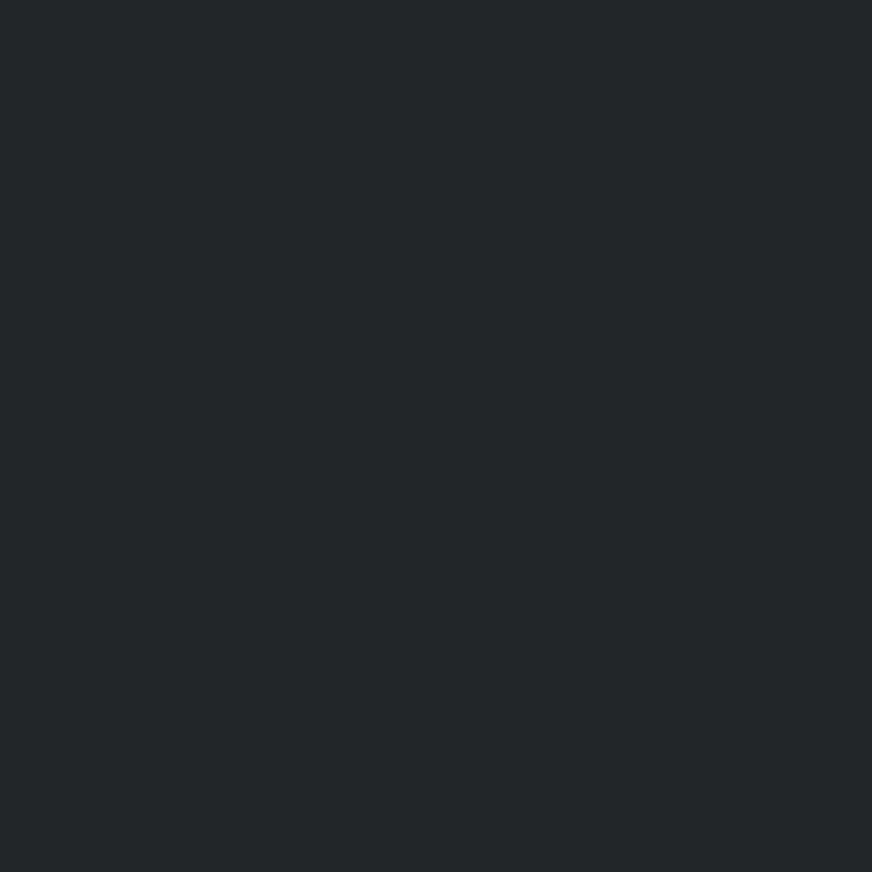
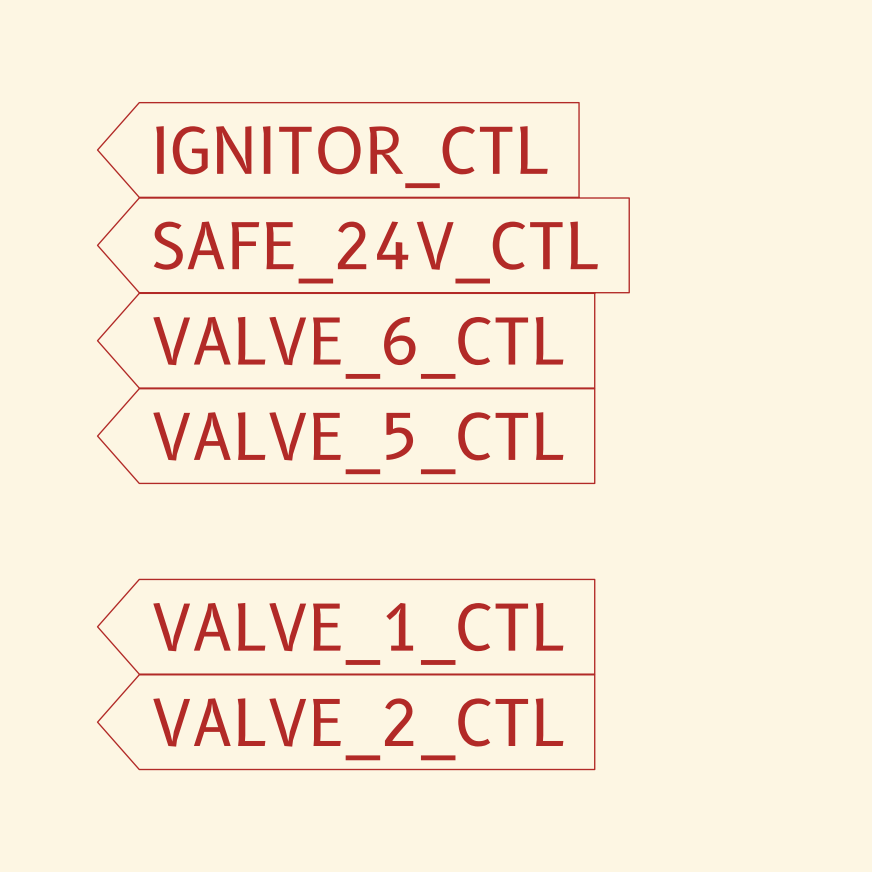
global label: none -> IGNITOR_CTL (351, 157)
global label: none -> SAFE_24V_CTL (375, 252)
global label: none -> VALVE_6_CTL (358, 347)
global label: none -> VALVE_5_CTL (358, 443)
global label: none -> VALVE_1_CTL (358, 633)
global label: none -> VALVE_2_CTL (358, 729)

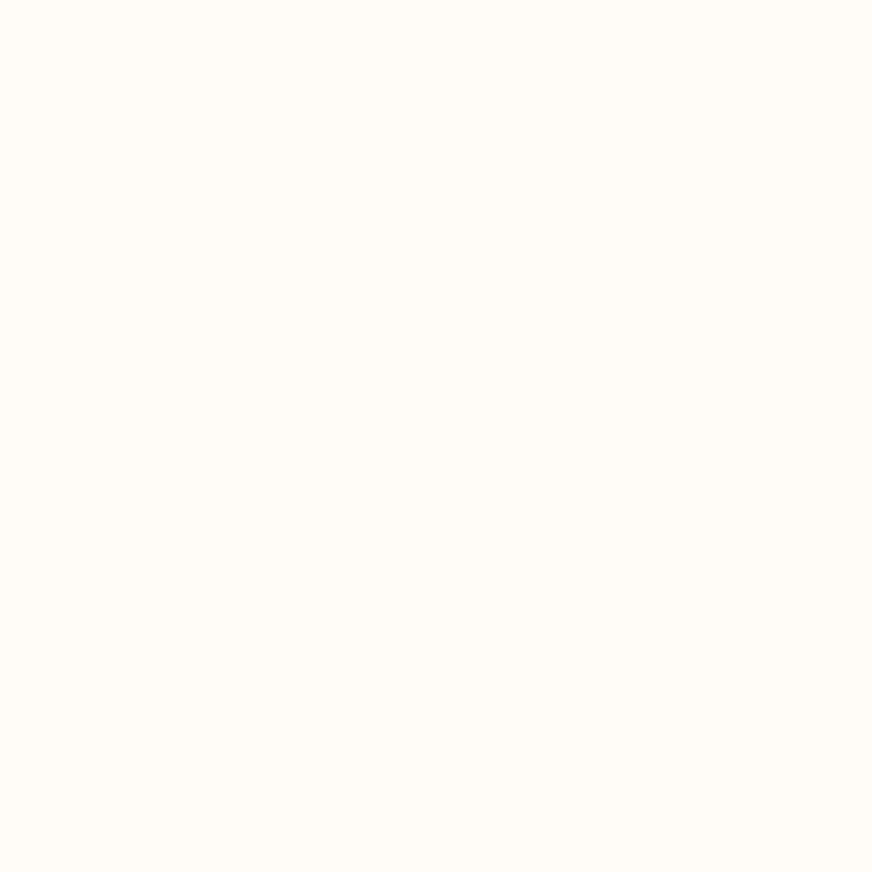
global label: IGNITOR_CTL (351, 157) -> none
global label: SAFE_24V_CTL (375, 252) -> none
global label: VALVE_6_CTL (358, 347) -> none
global label: VALVE_5_CTL (358, 443) -> none
global label: VALVE_1_CTL (358, 633) -> none
global label: VALVE_2_CTL (358, 729) -> none

